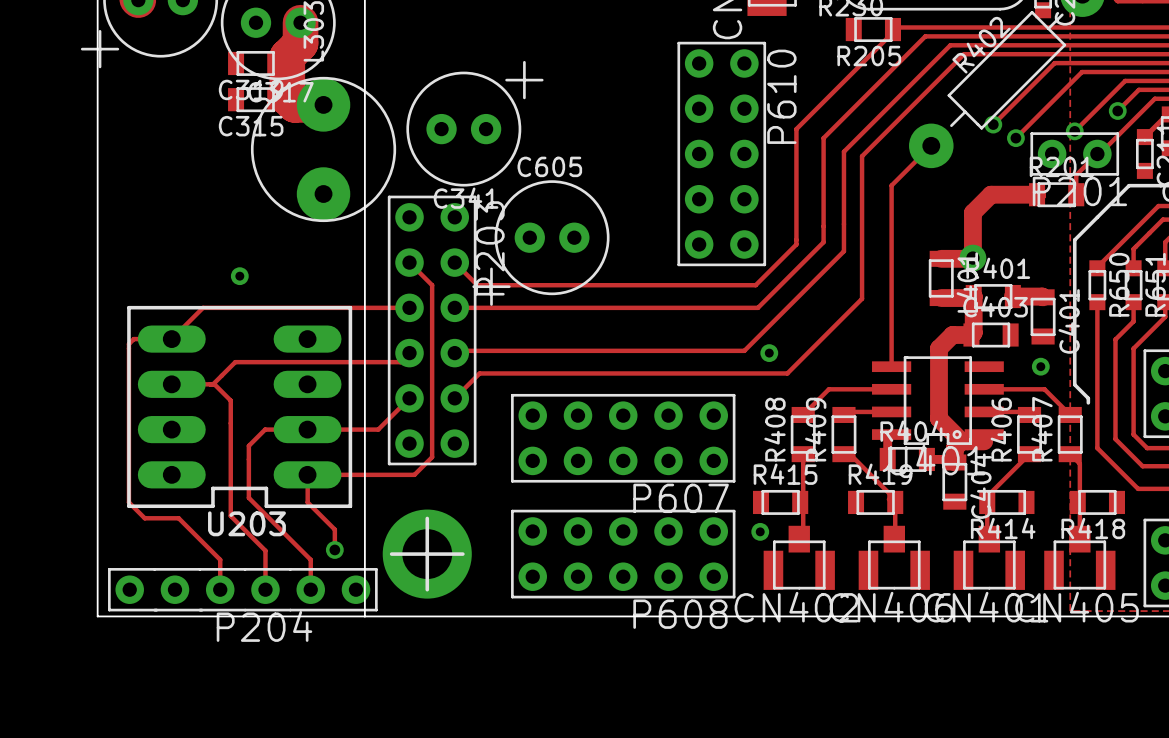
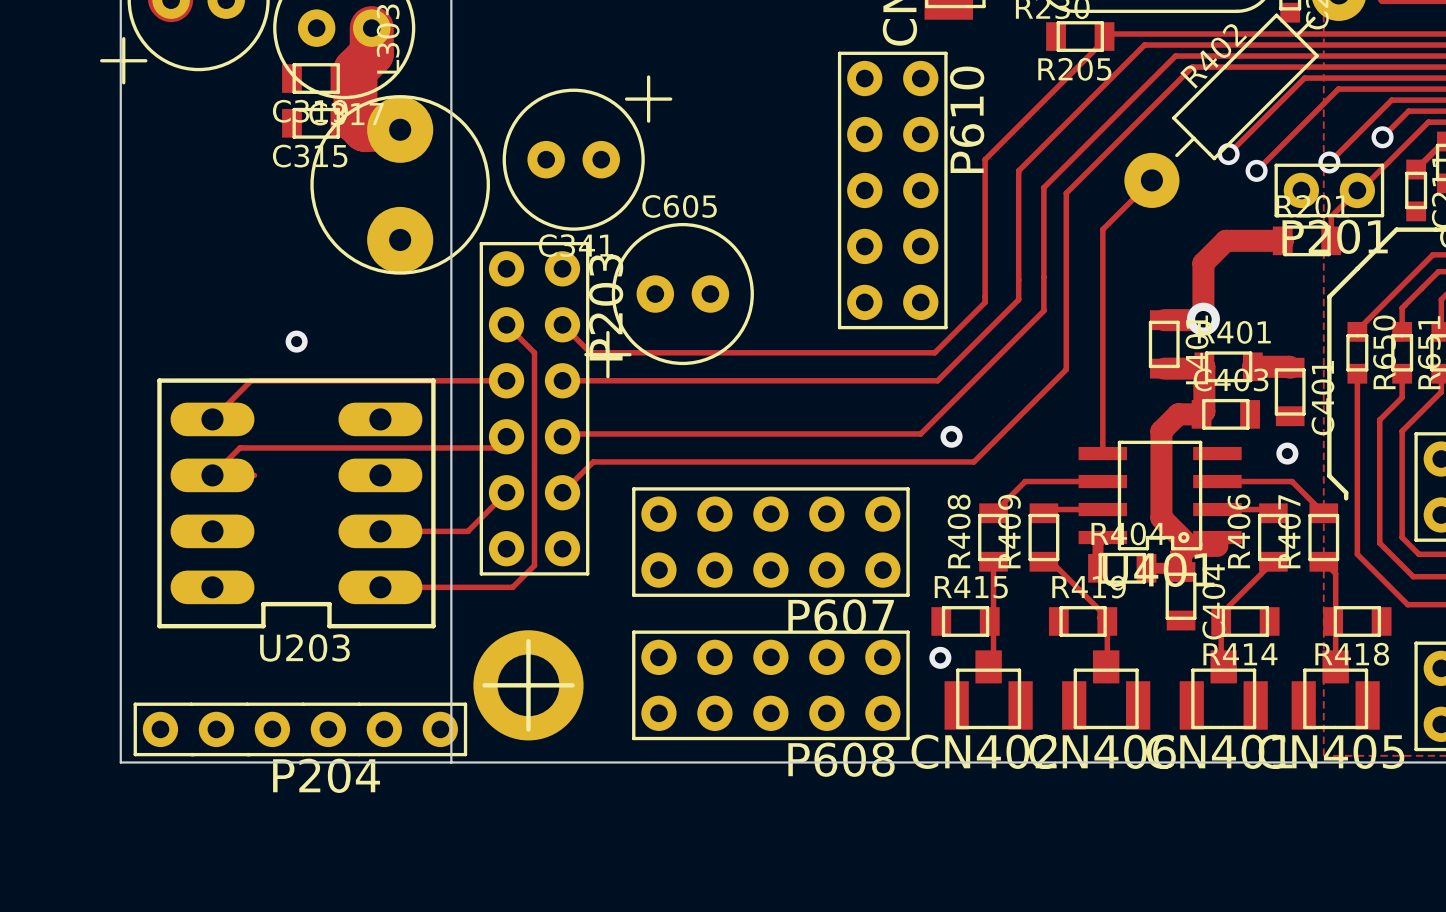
track: (171, 339) (133, 339) (128, 344) (128, 502) (144, 518) (178, 518) (220, 559) (220, 589) -> none
track: (235, 362) (213, 384) -> (291, 447) (239, 447) (212, 475)
track: (205, 384) (214, 384) (230, 400) (230, 516) (265, 550) (265, 589) -> none
track: (307, 429) (265, 429) (248, 445) (248, 497) (310, 559) (310, 589) -> none
track: (307, 474) (307, 502) (334, 529) (334, 549) -> none
via: (334, 549) -> none

